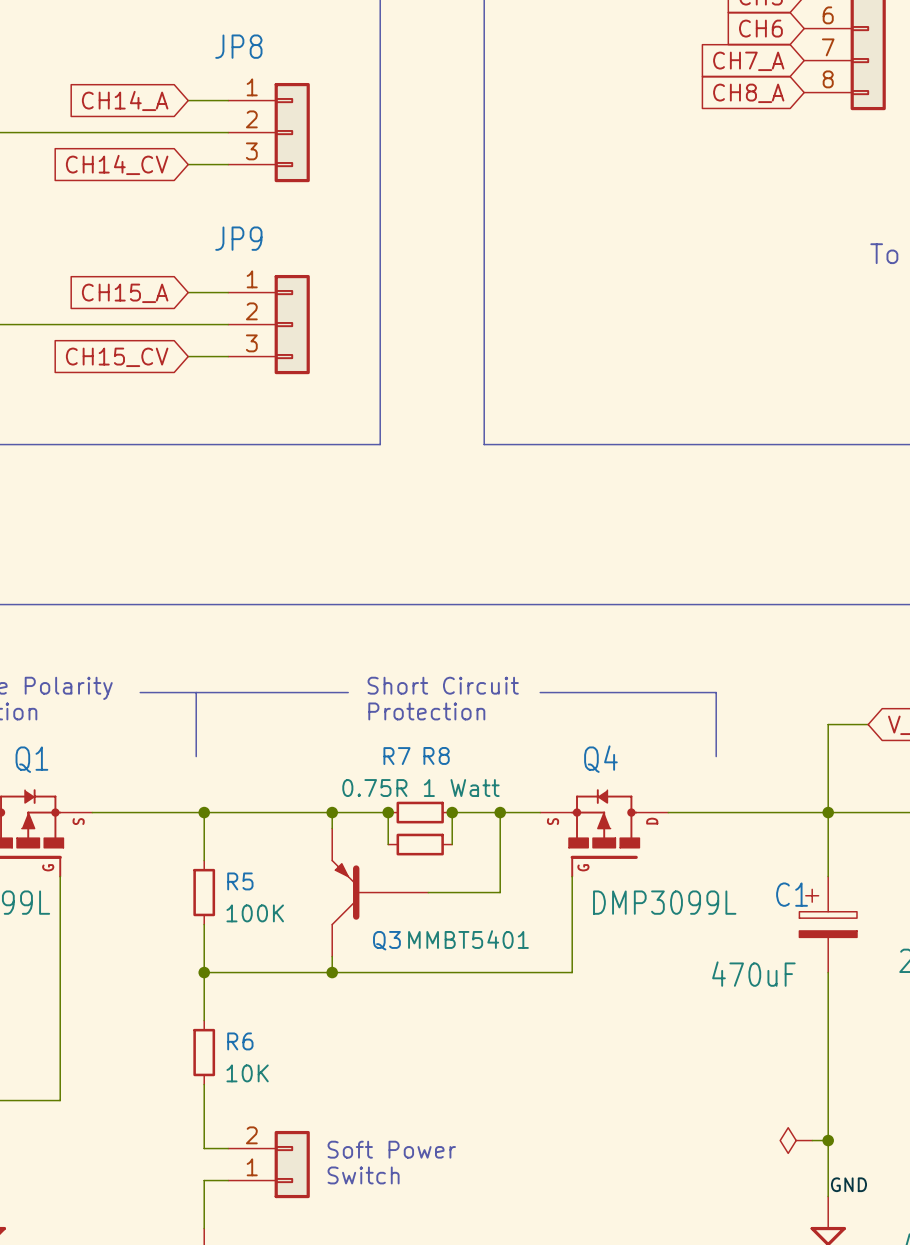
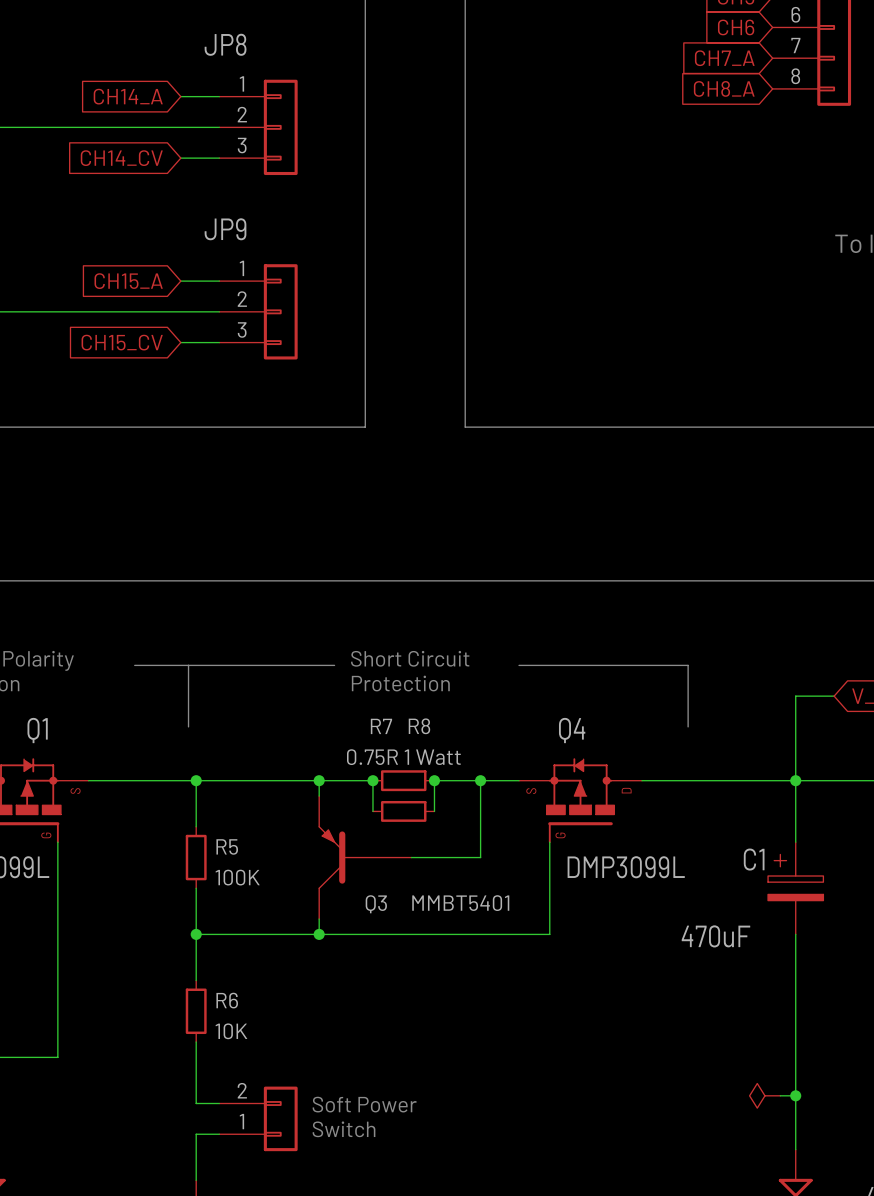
label: GND (848, 1184) -> none

